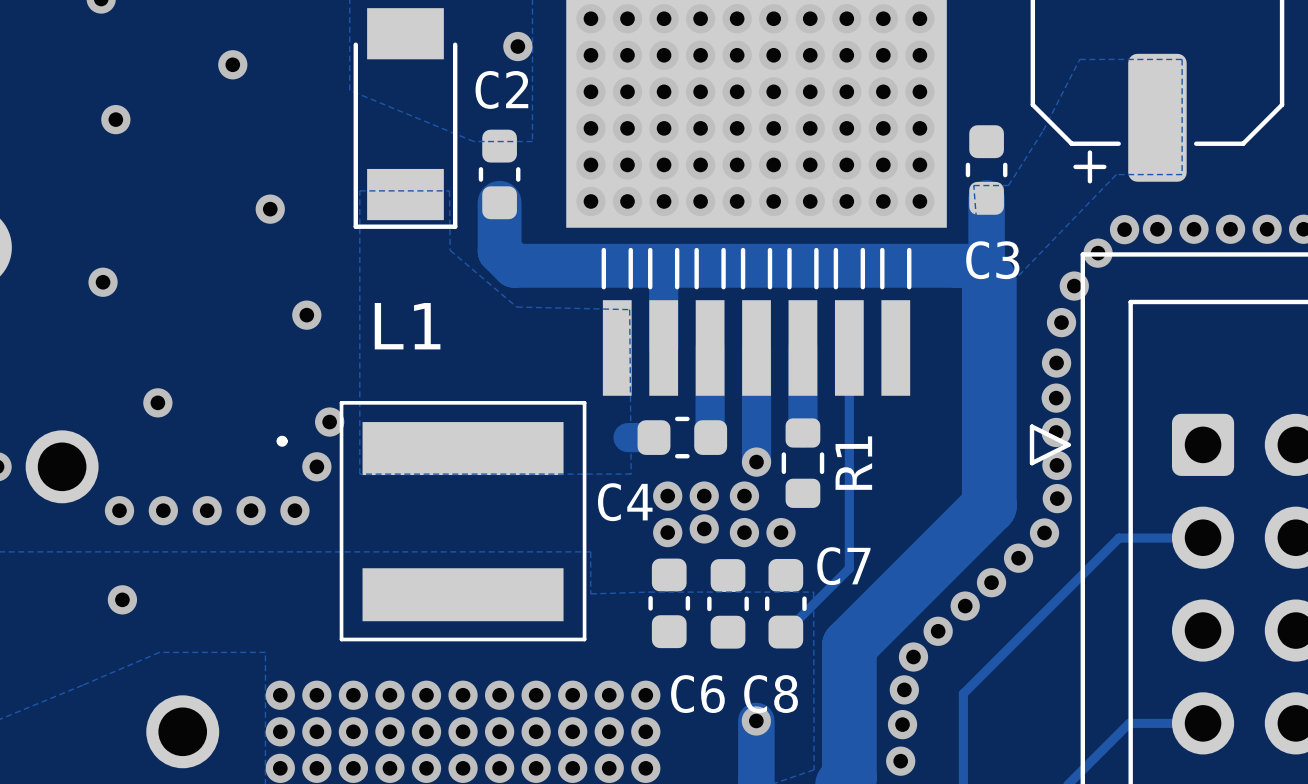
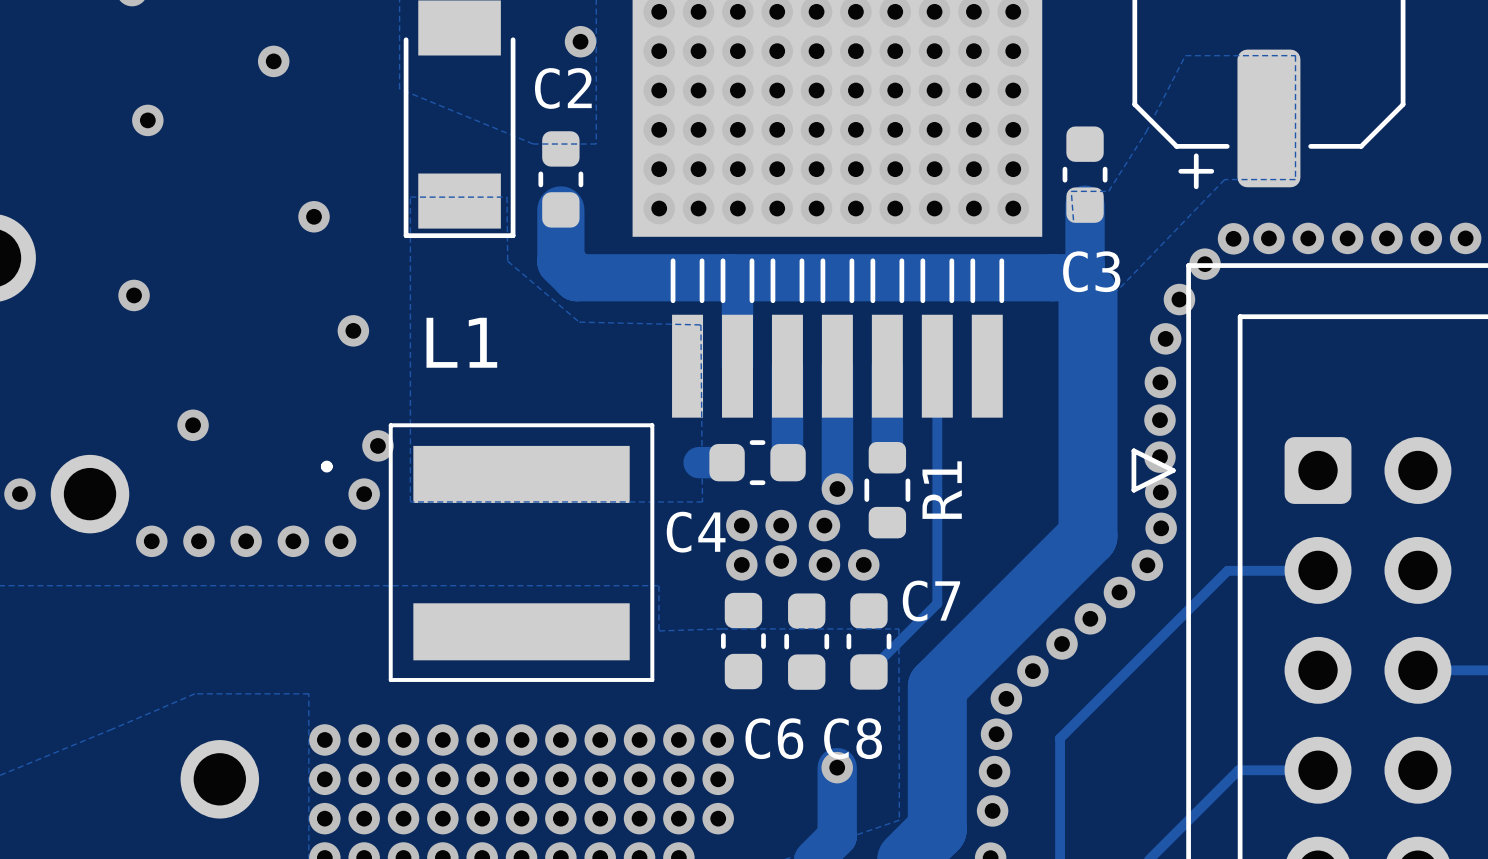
via: (122, 599) -> none

